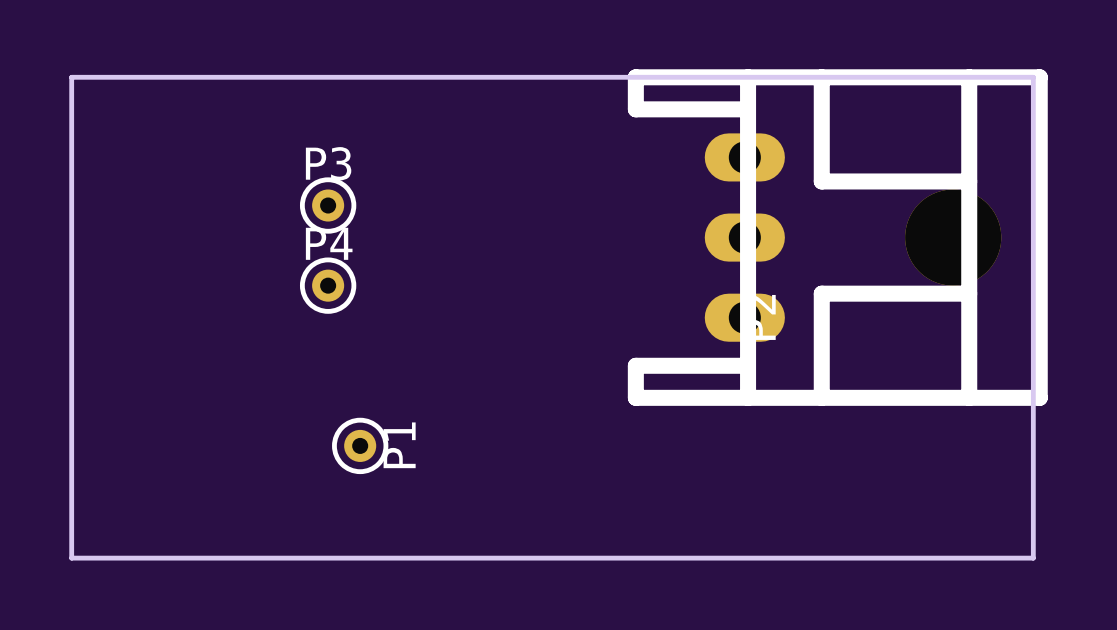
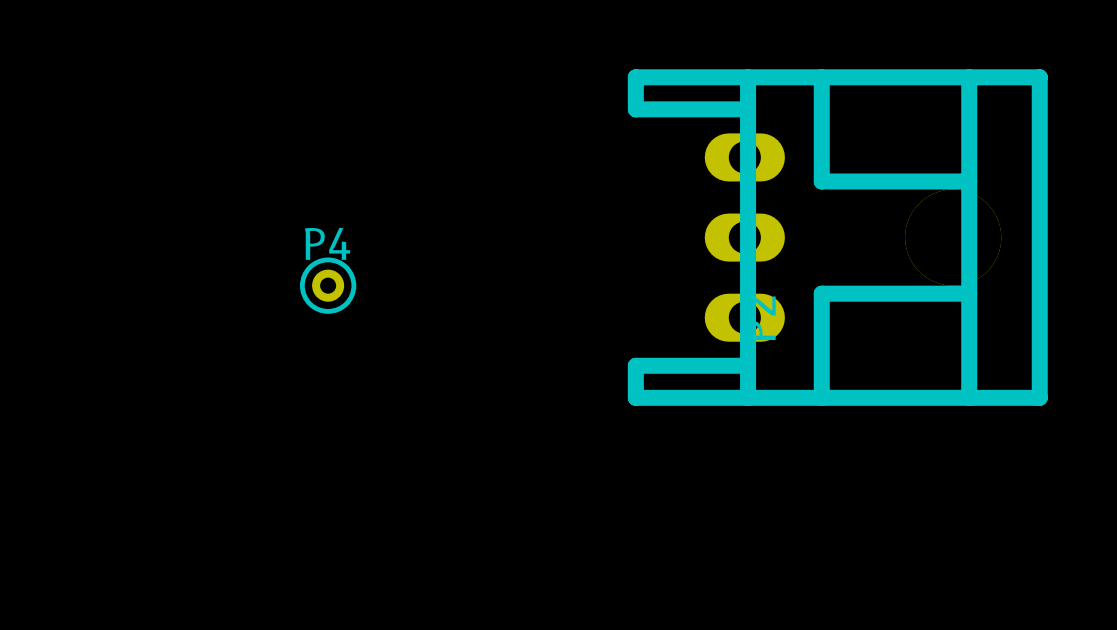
board edge: (71, 77) (1033, 77) (1033, 558) (71, 558) (71, 77) -> none
P3: (328, 205) -> none
P1: (360, 445) -> none

